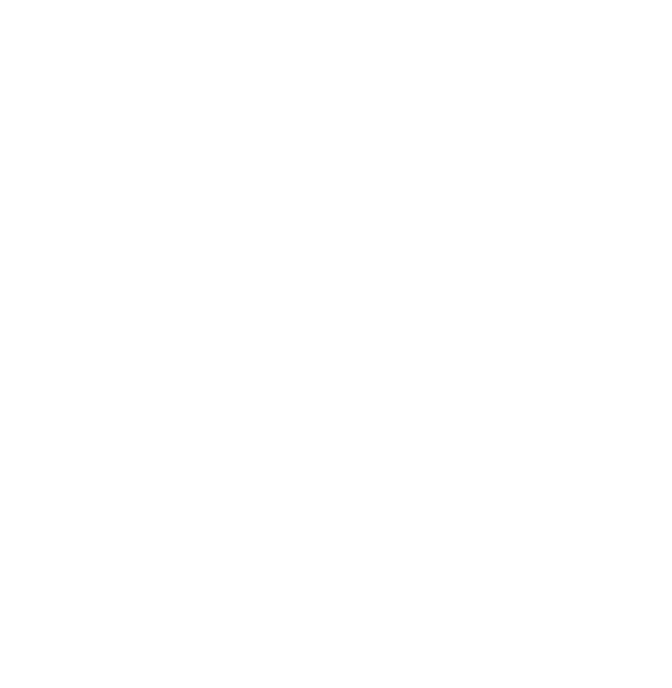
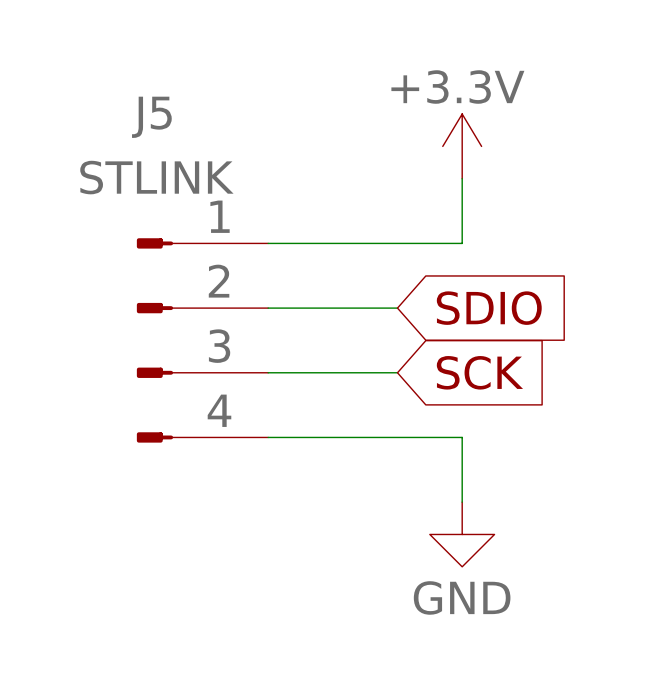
power symbol: none -> +3.3V (462, 146)
wire: none -> (462, 178) (462, 243) (268, 243)
wire: none -> (268, 308) (397, 308)
global label: none -> SDIO (489, 308)
J5: none -> STLINK (202, 340)
wire: none -> (268, 372) (397, 372)
global label: none -> SCK (479, 372)
wire: none -> (268, 437) (462, 437) (462, 502)
power symbol: none -> GND (462, 534)

